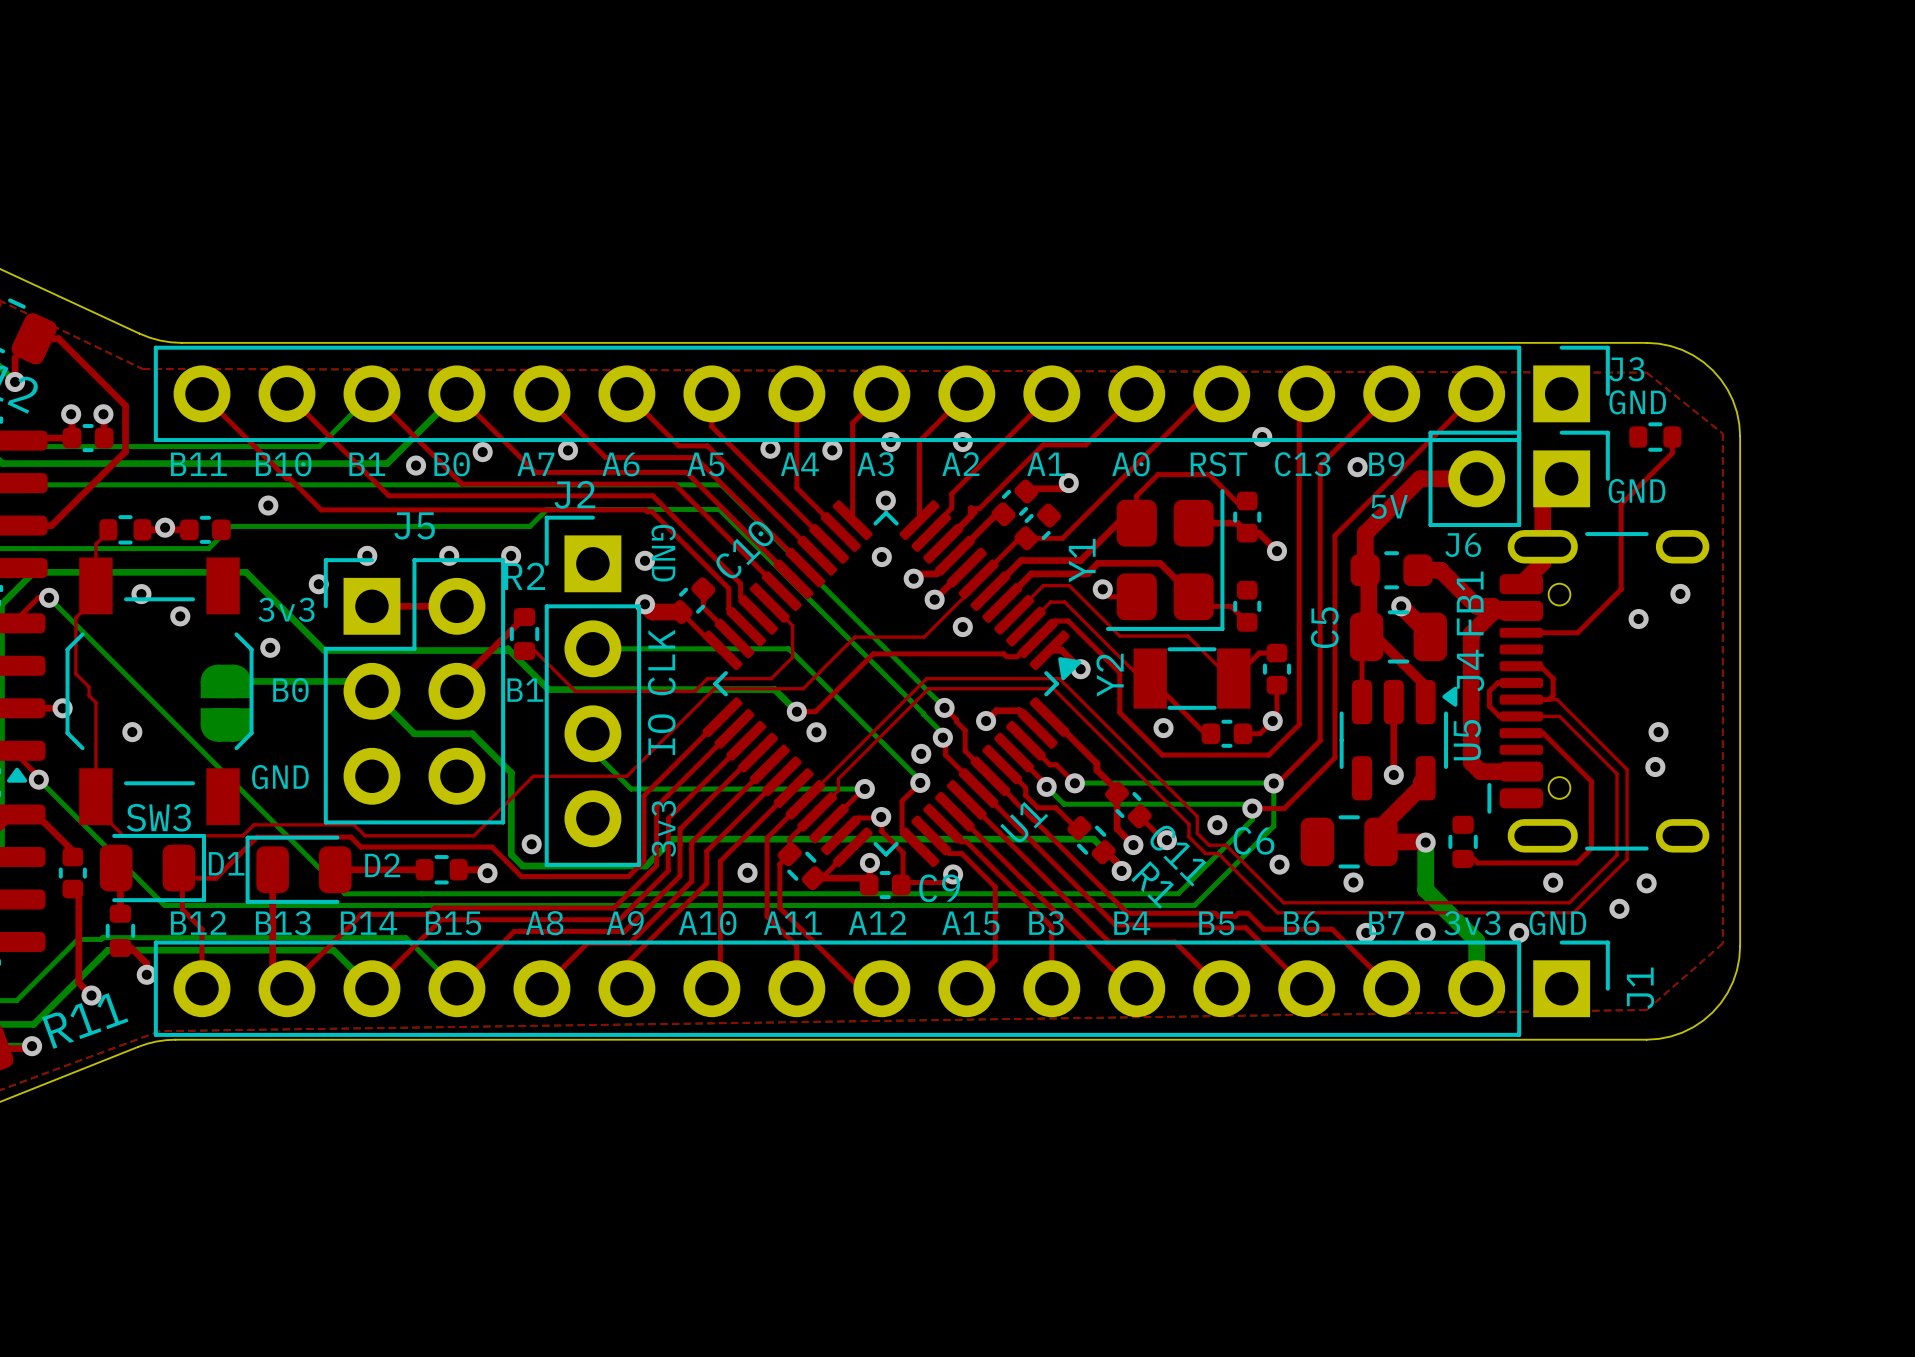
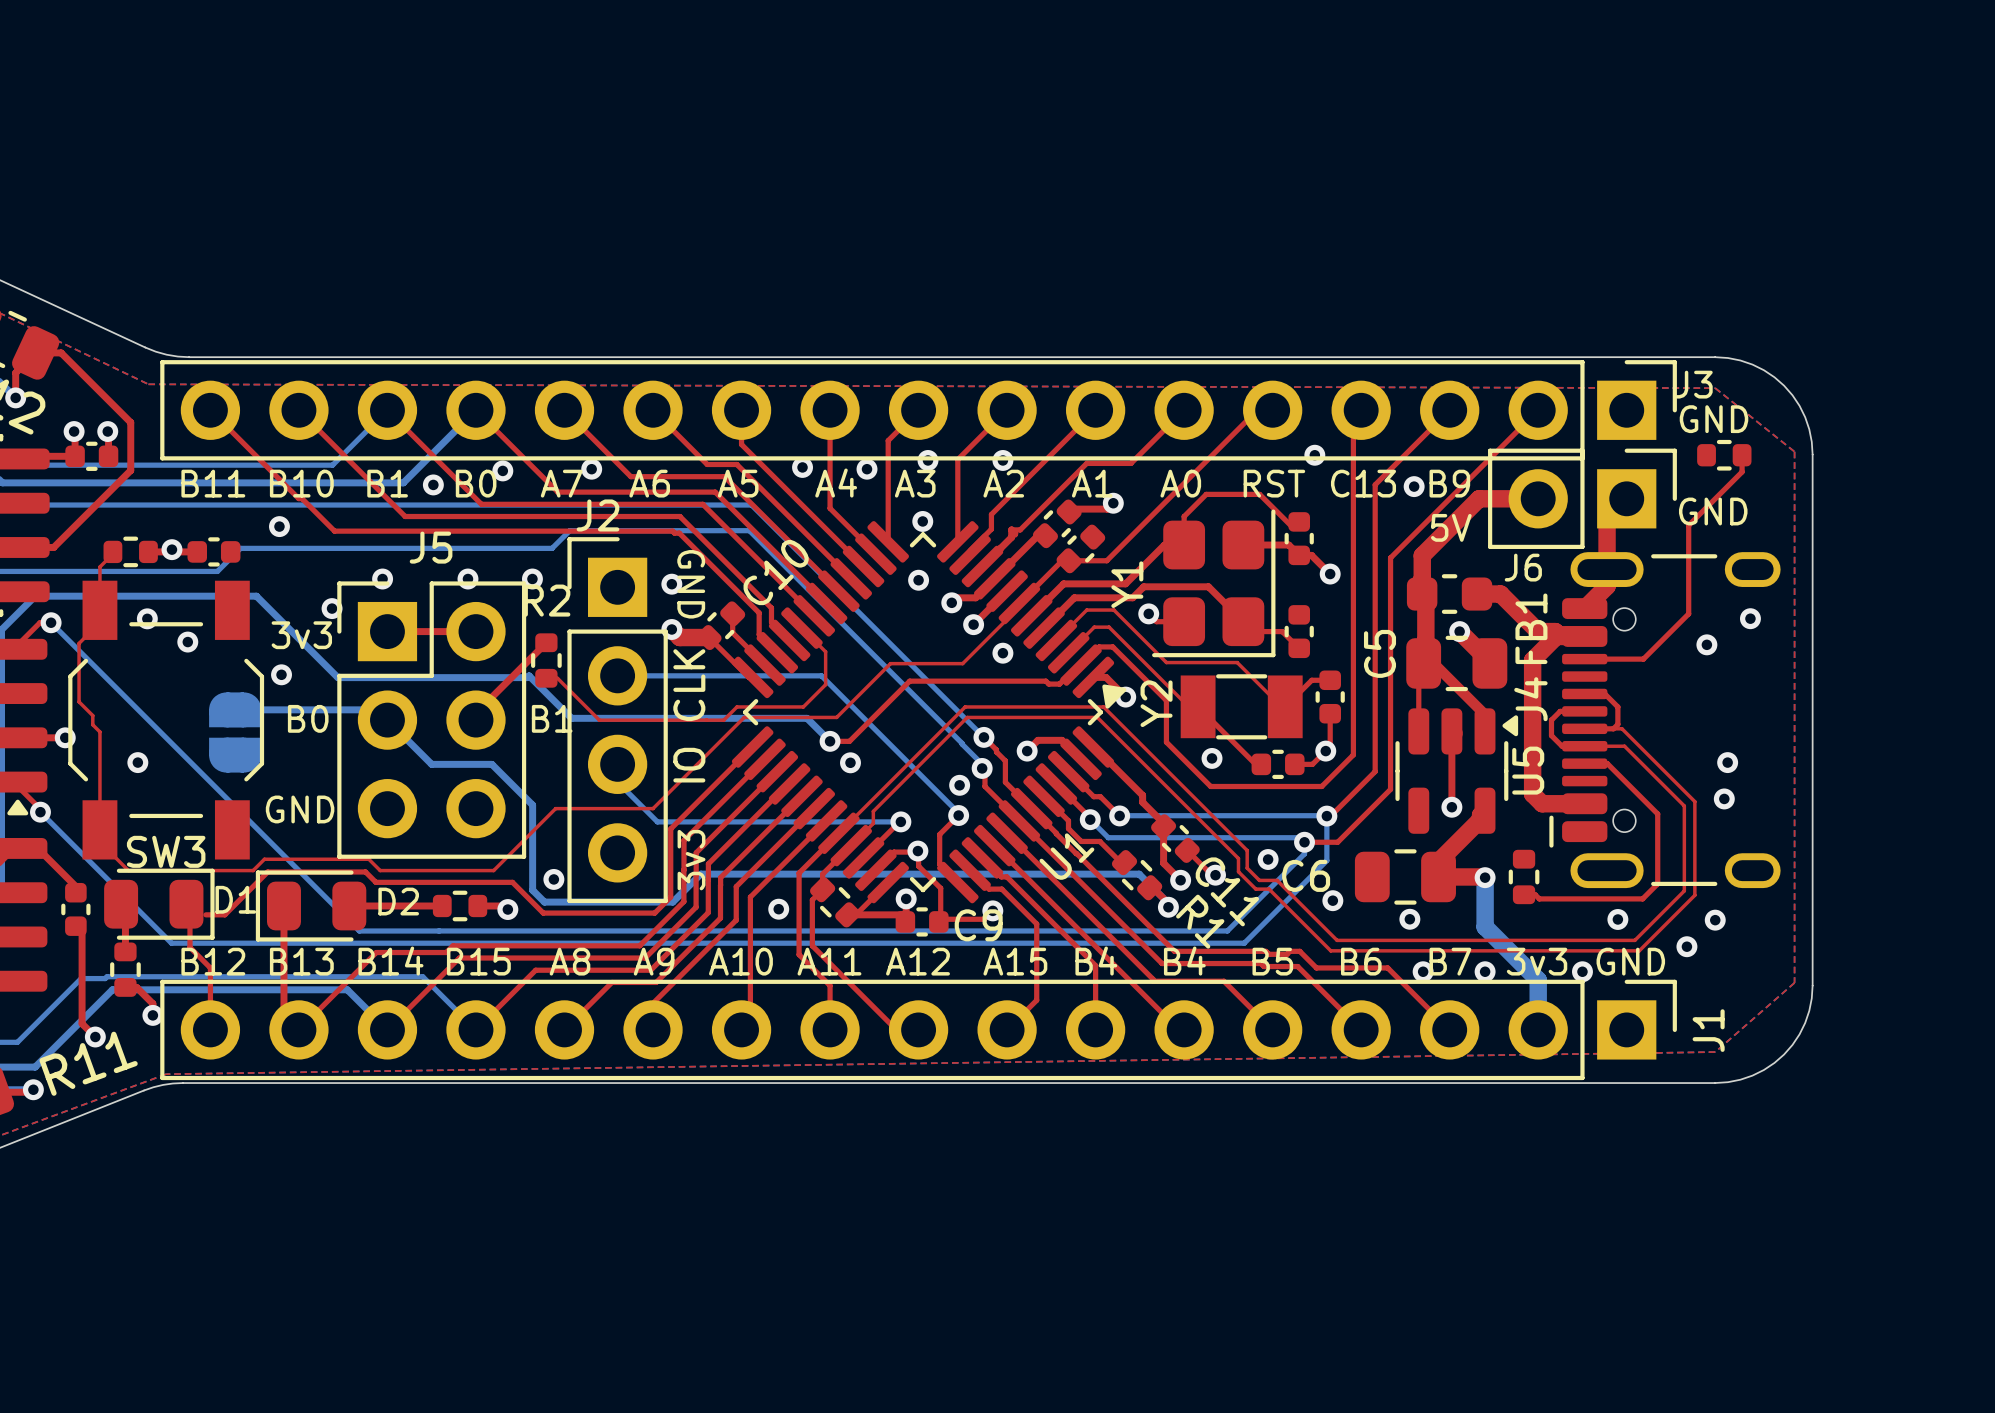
text: B3 (1046, 923) -> B4 (1096, 961)

